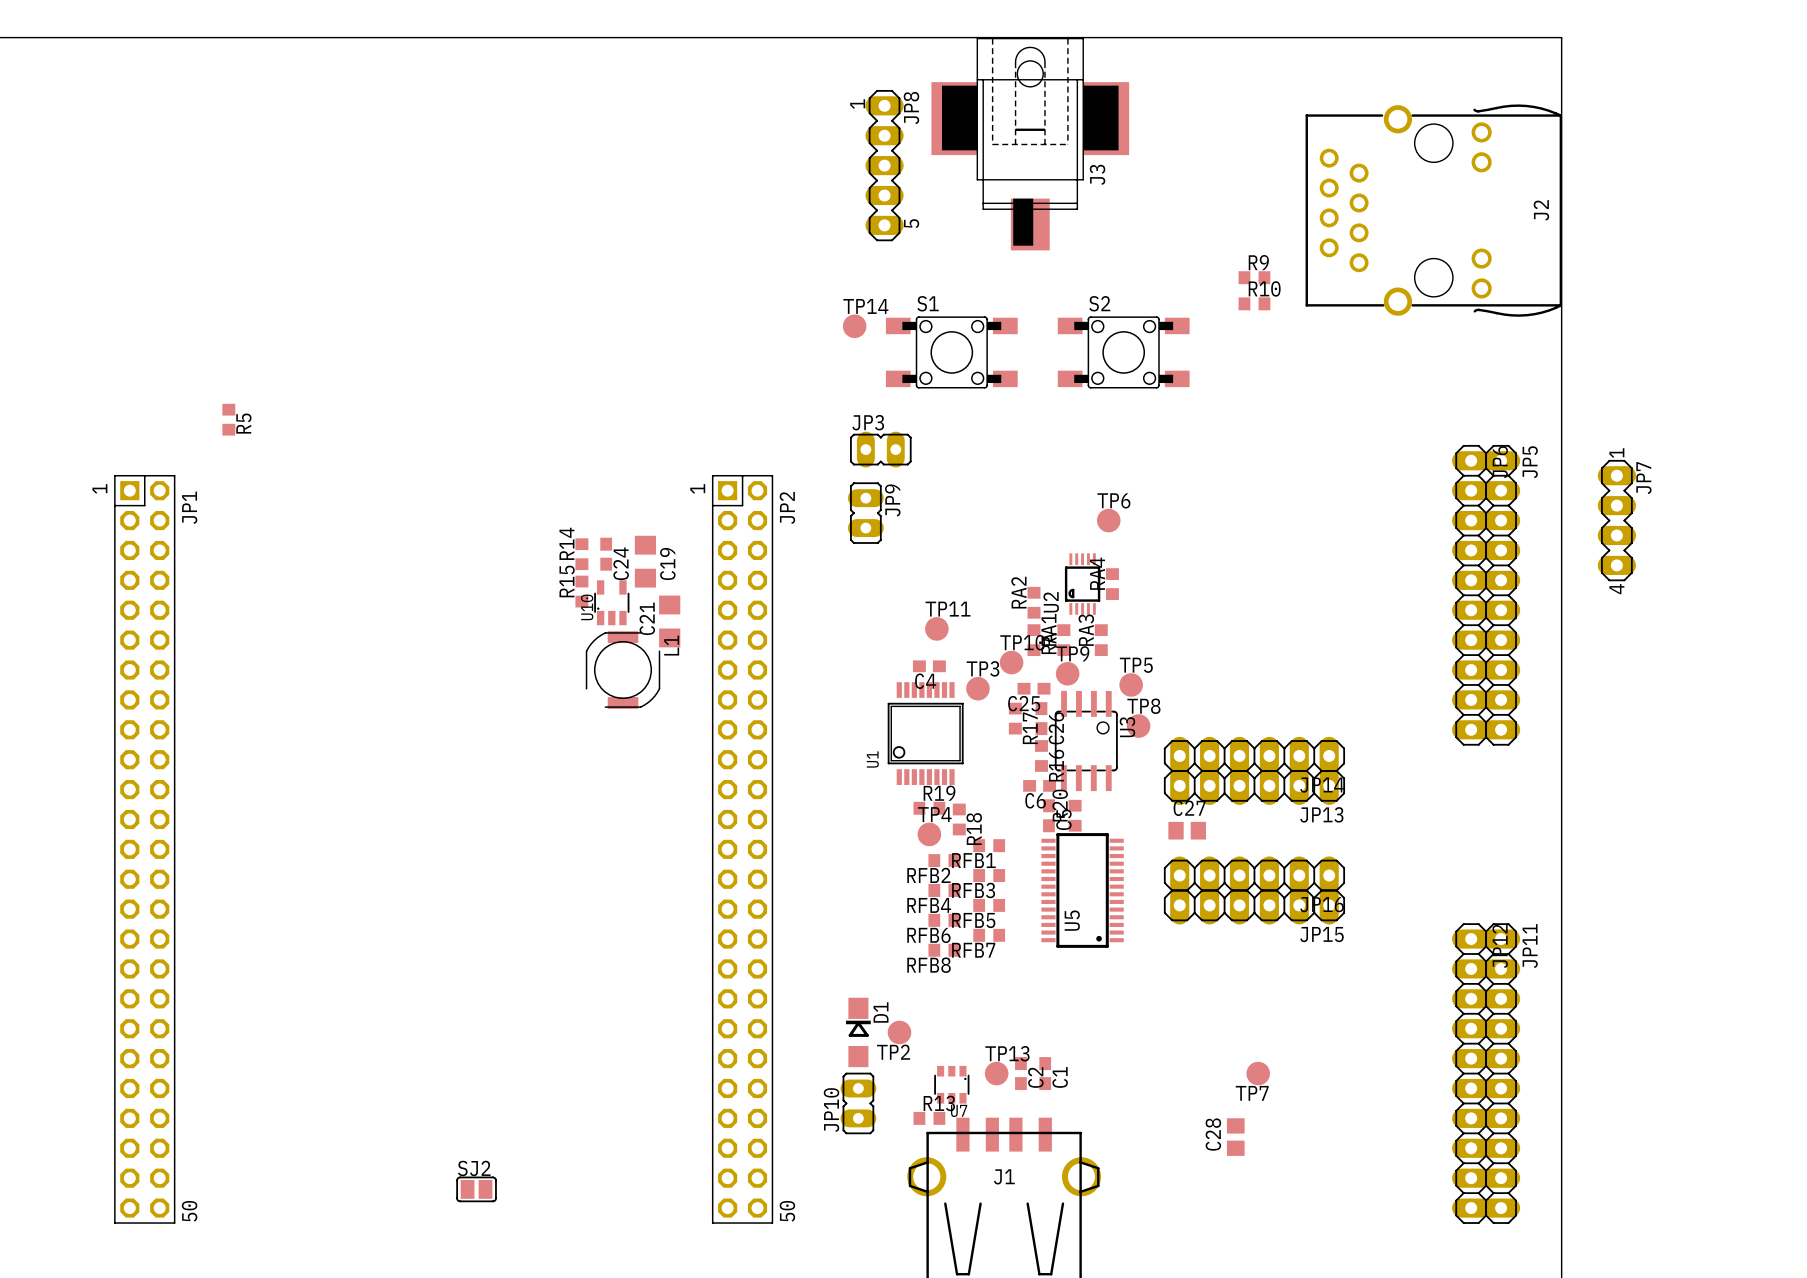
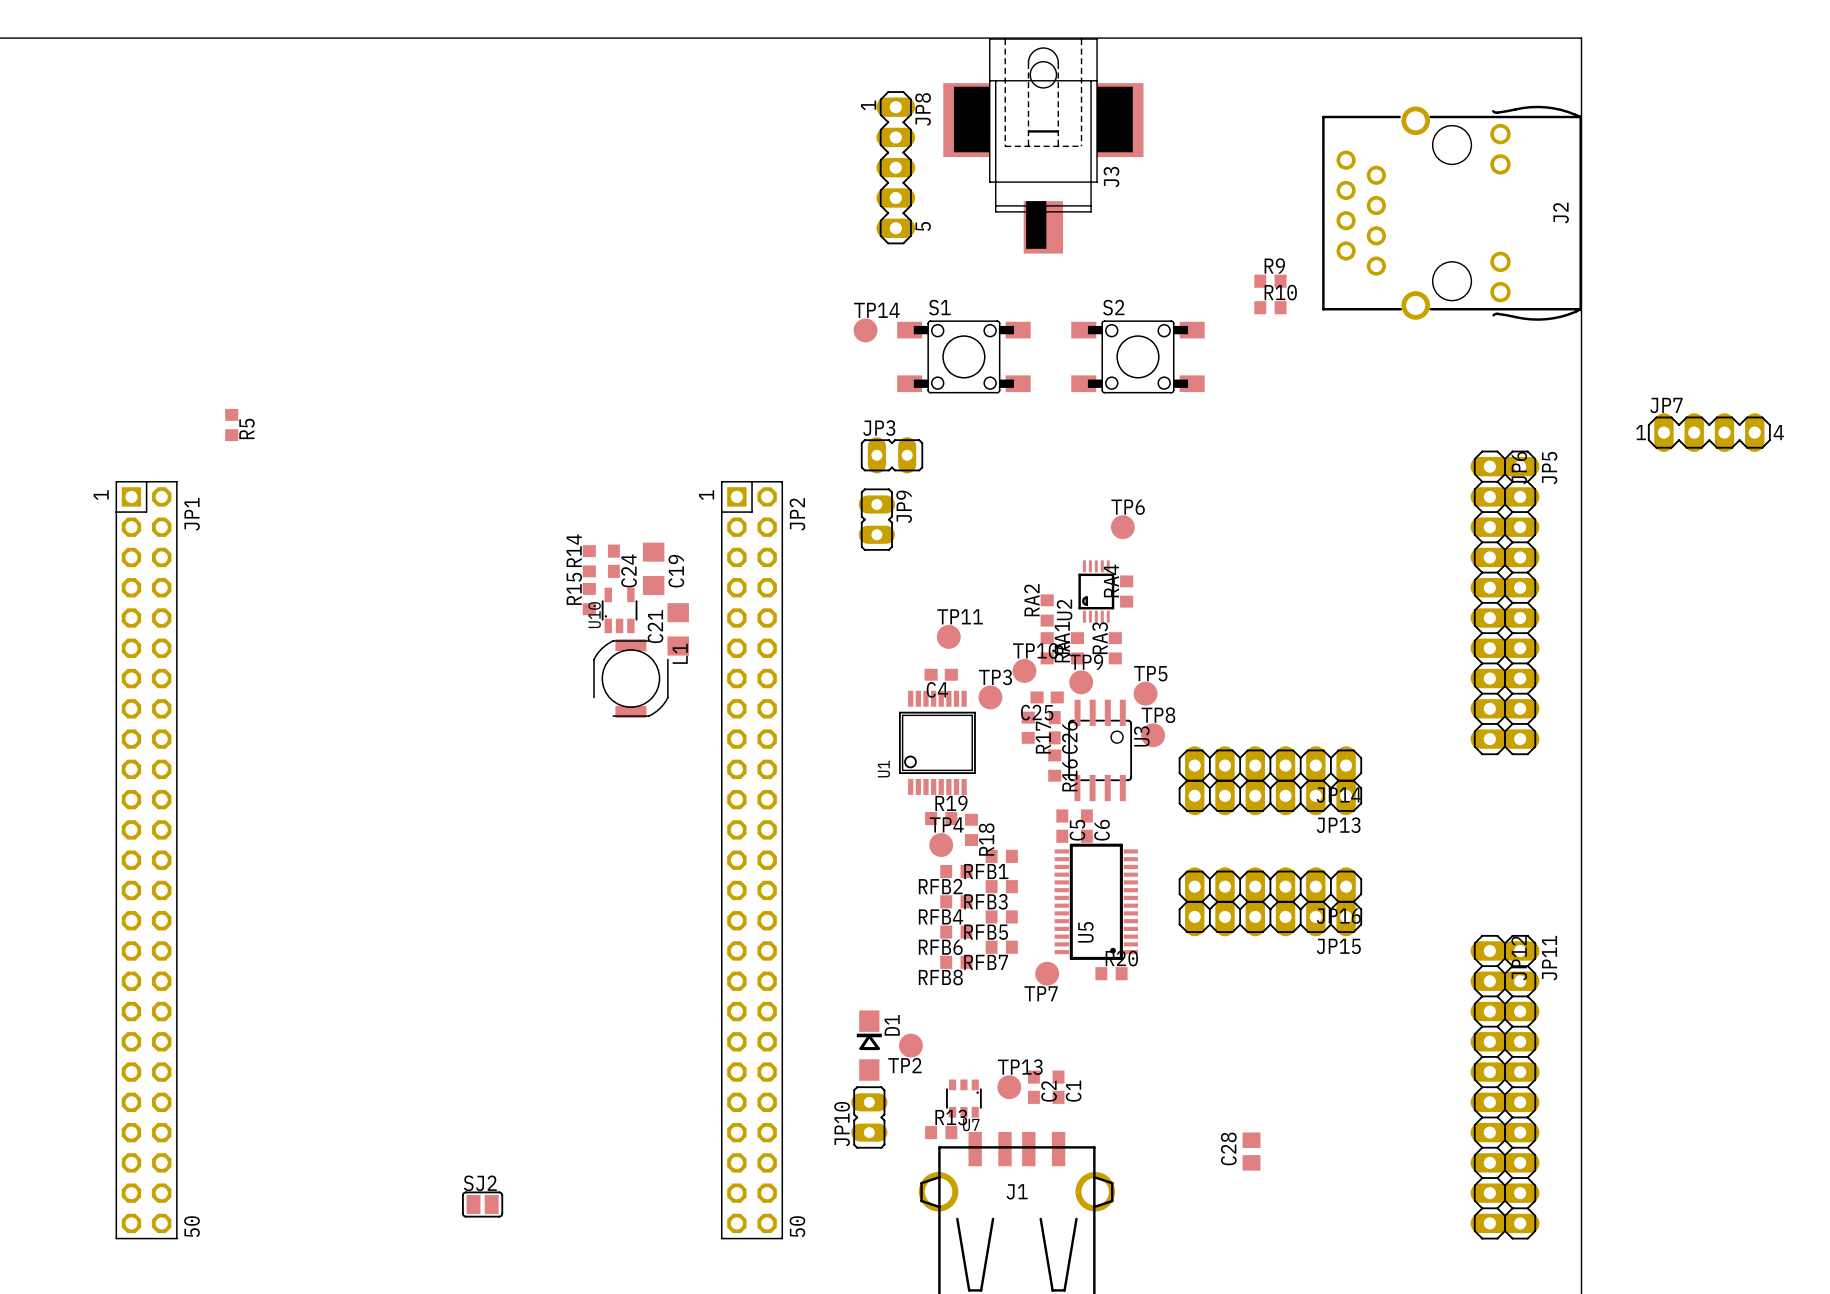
JP7 footprint: [1597, 459, 1637, 582] -> [1647, 413, 1771, 452]
JP7 name position: JP7 (1643, 478) -> JP7 (1666, 405)
C6 rotation: 0° (1039, 785) -> 90° clockwise (1086, 826)
C6 position: (1039, 785) -> (1086, 826)
C6 name position: C6 (1035, 800) -> C6 (1102, 830)
R20 rotation: 0° (1075, 815) -> 90° clockwise (1111, 973)
R20 position: (1075, 815) -> (1111, 973)
C27: (1187, 830) -> none
TP7 position: (1258, 1073) -> (1047, 973)

